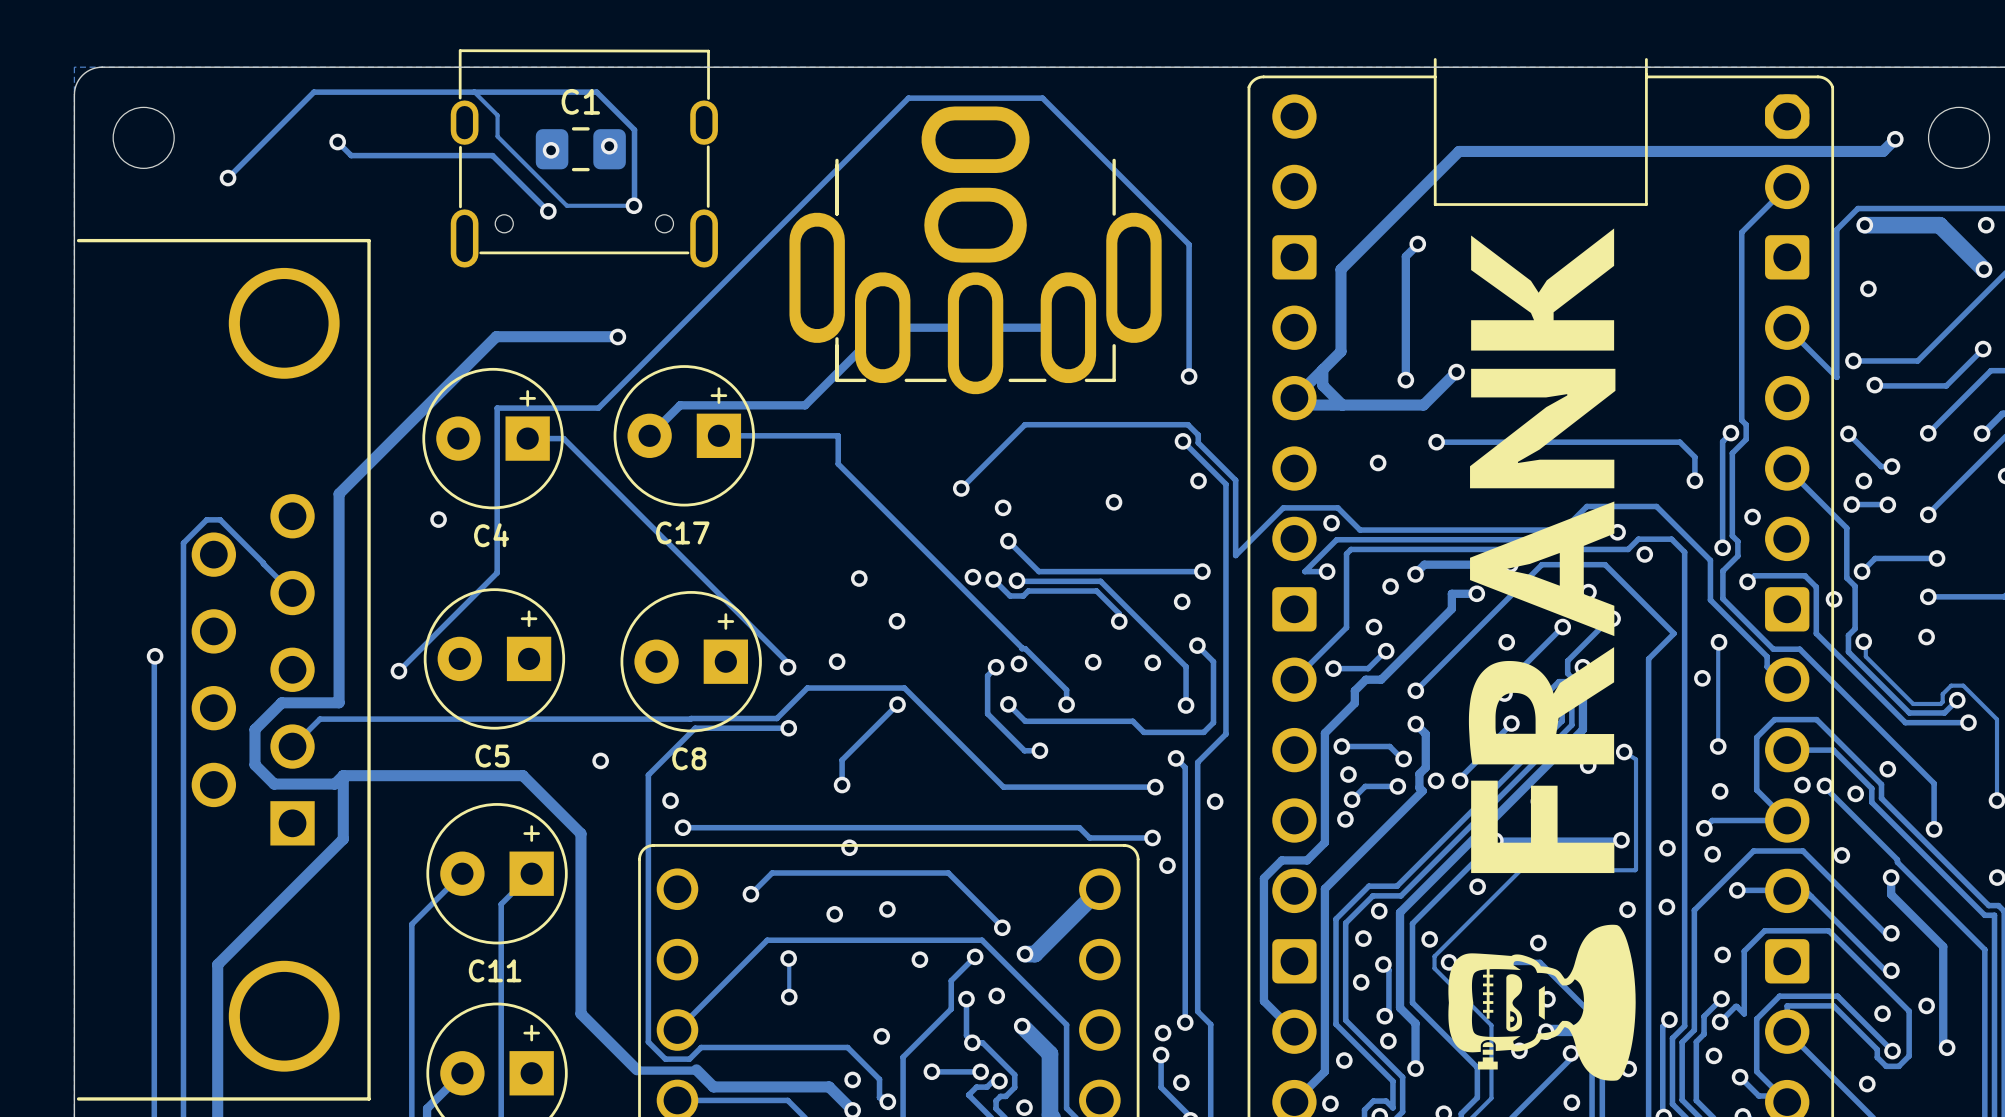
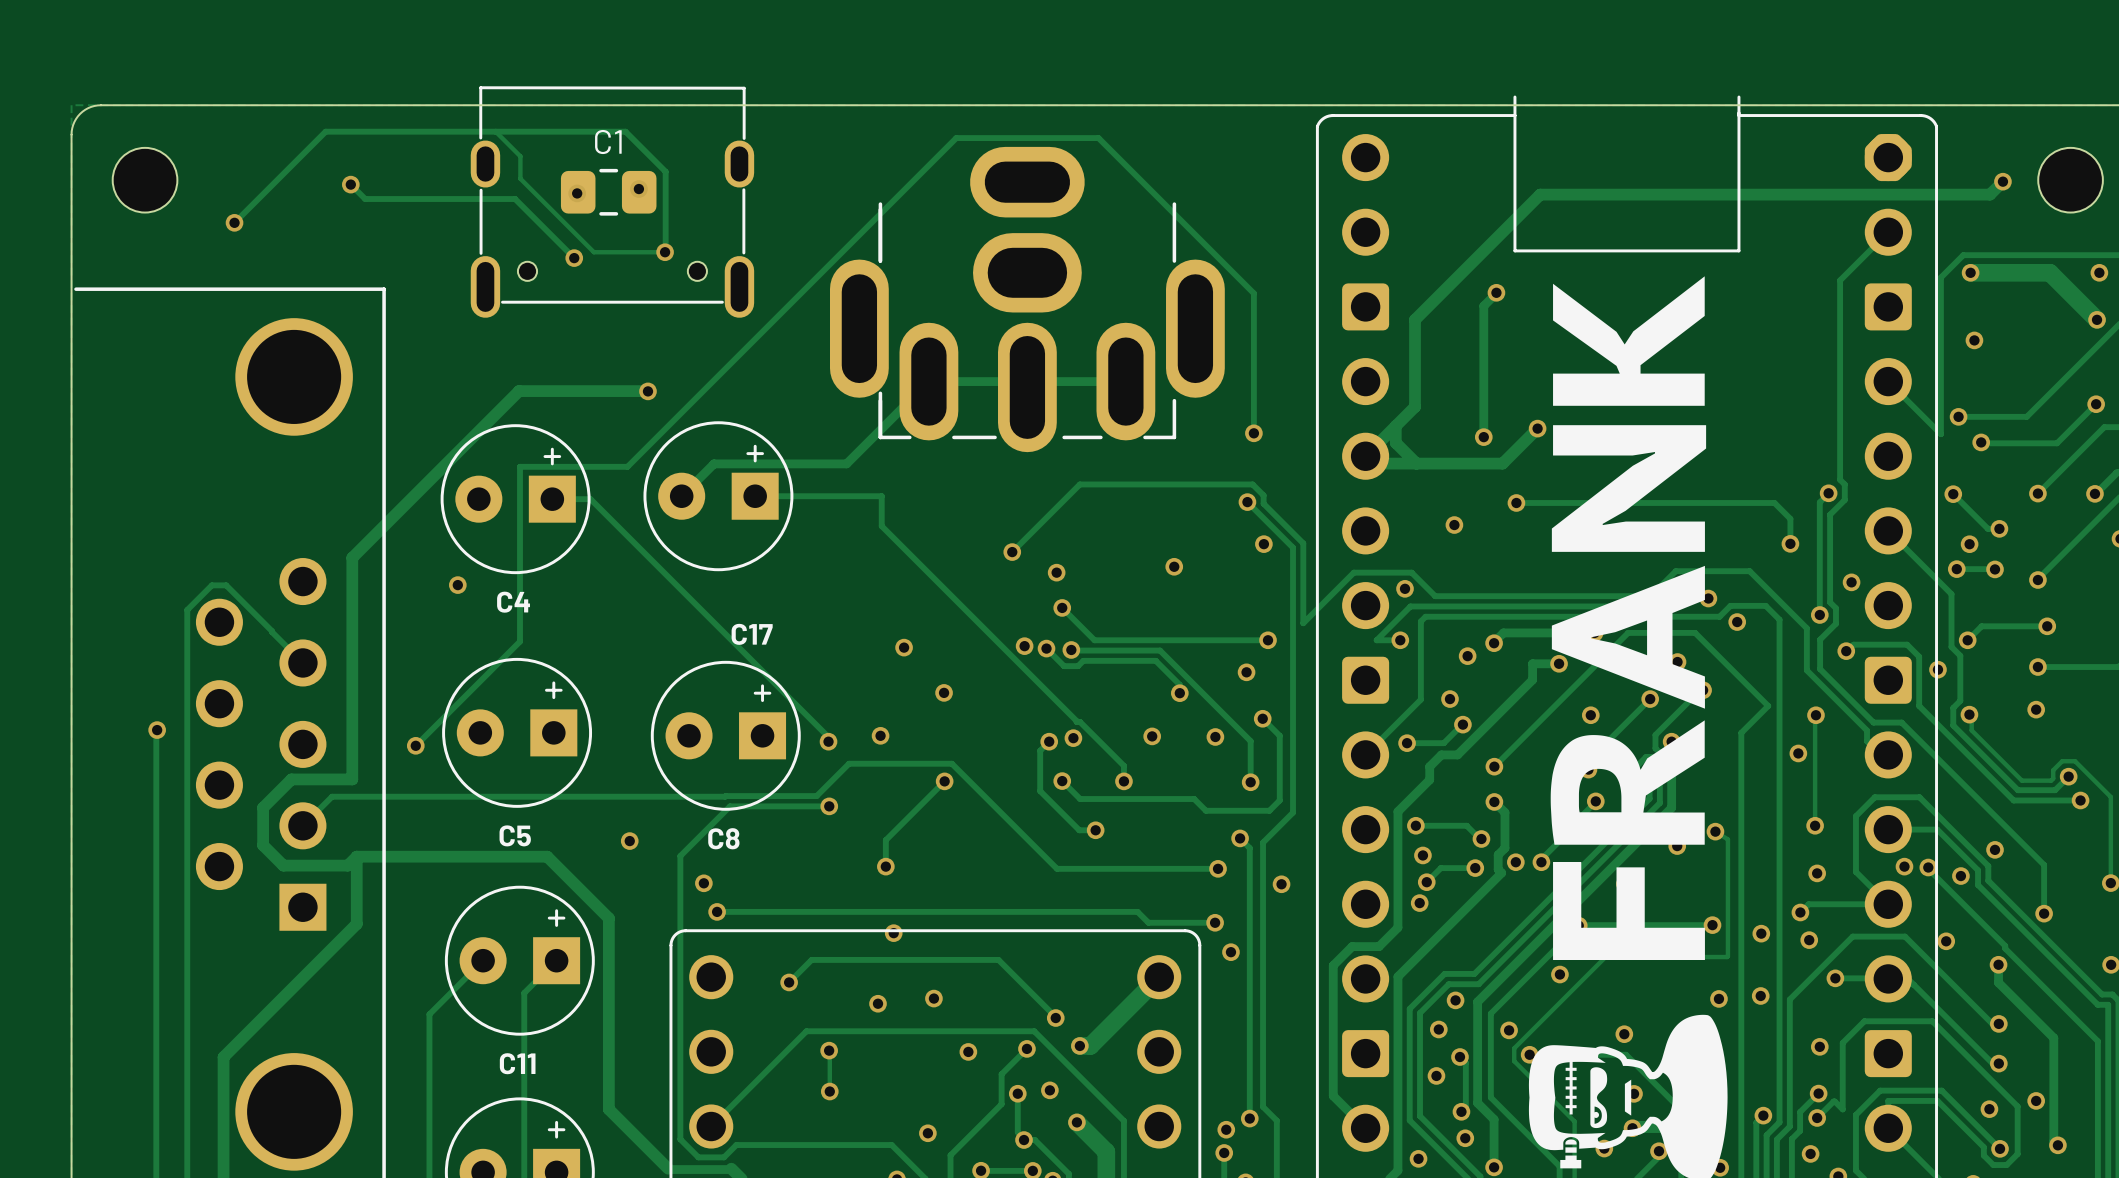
C17 name position: C17 (682, 532) -> C17 (752, 634)

